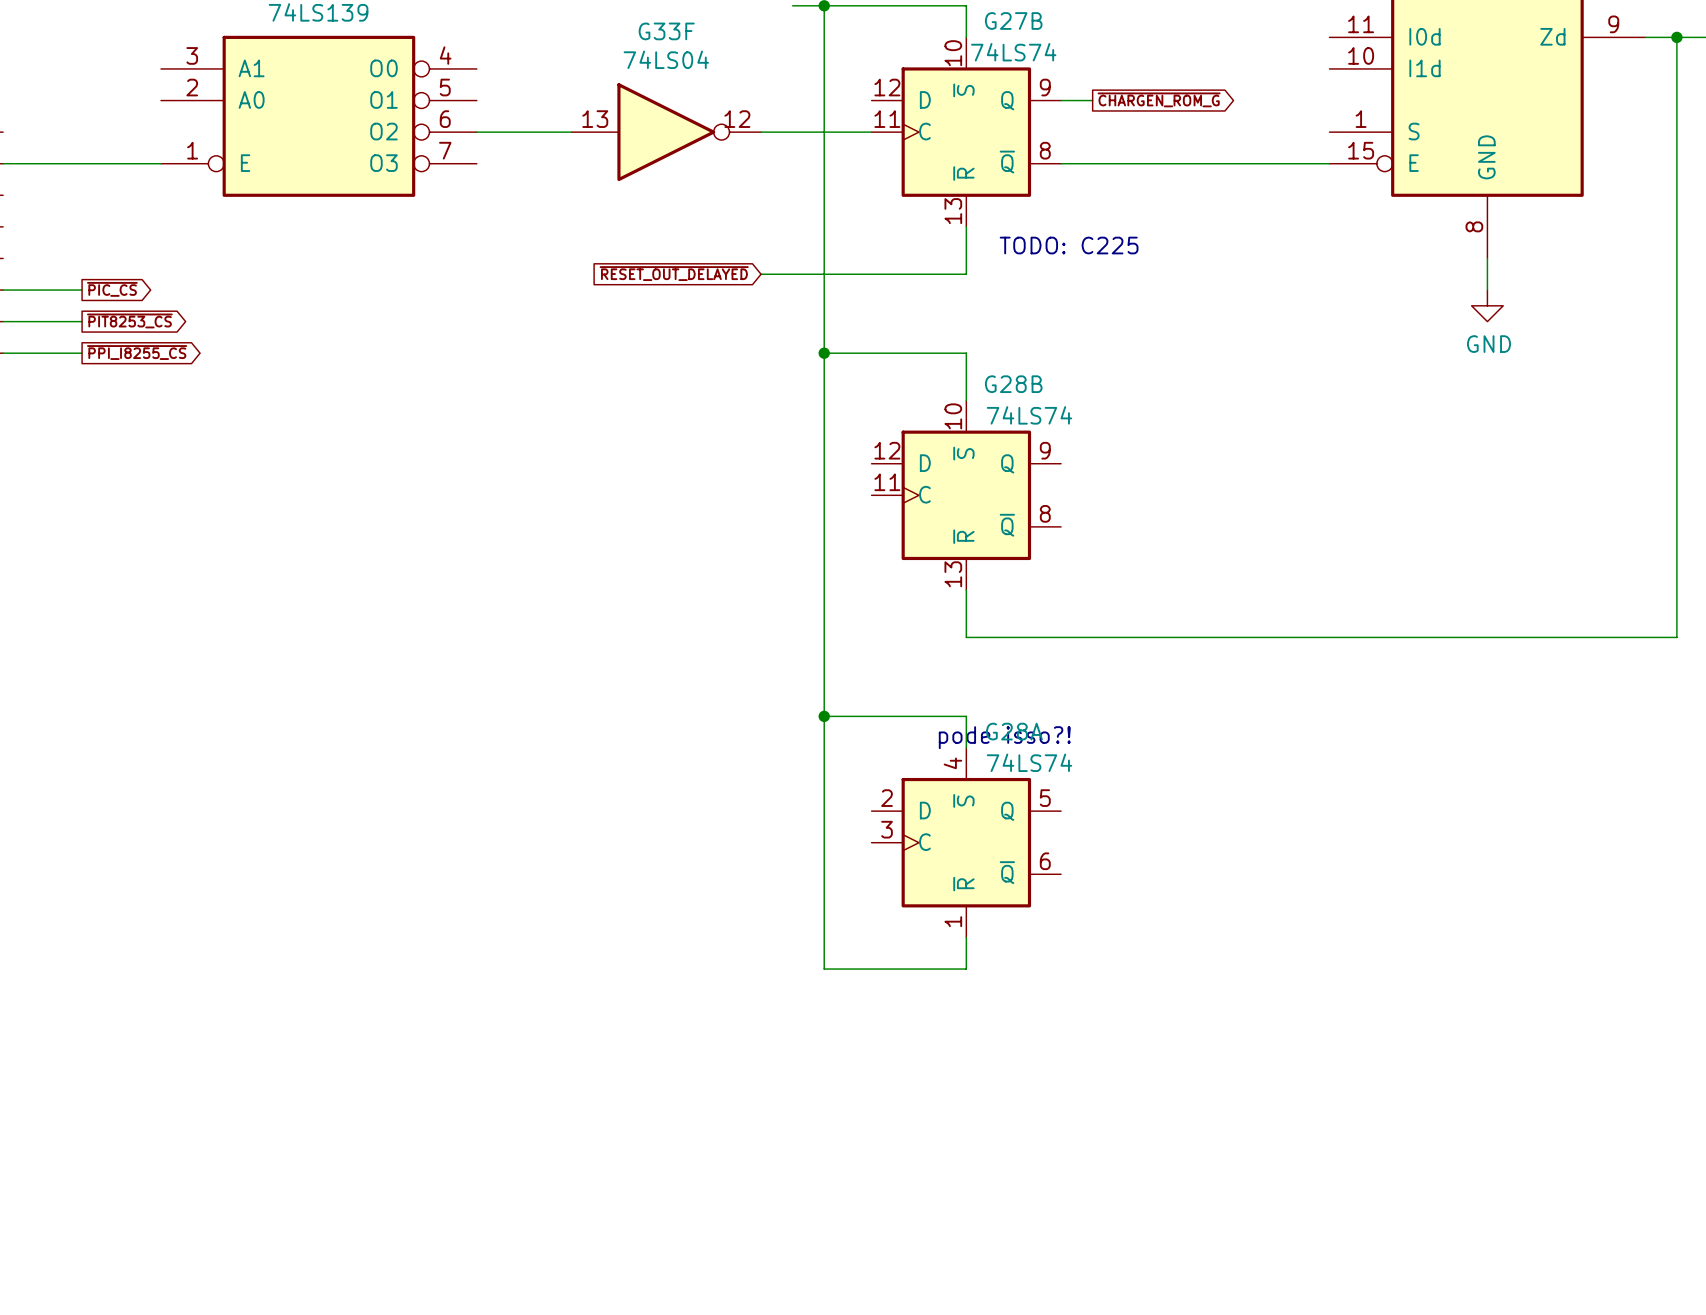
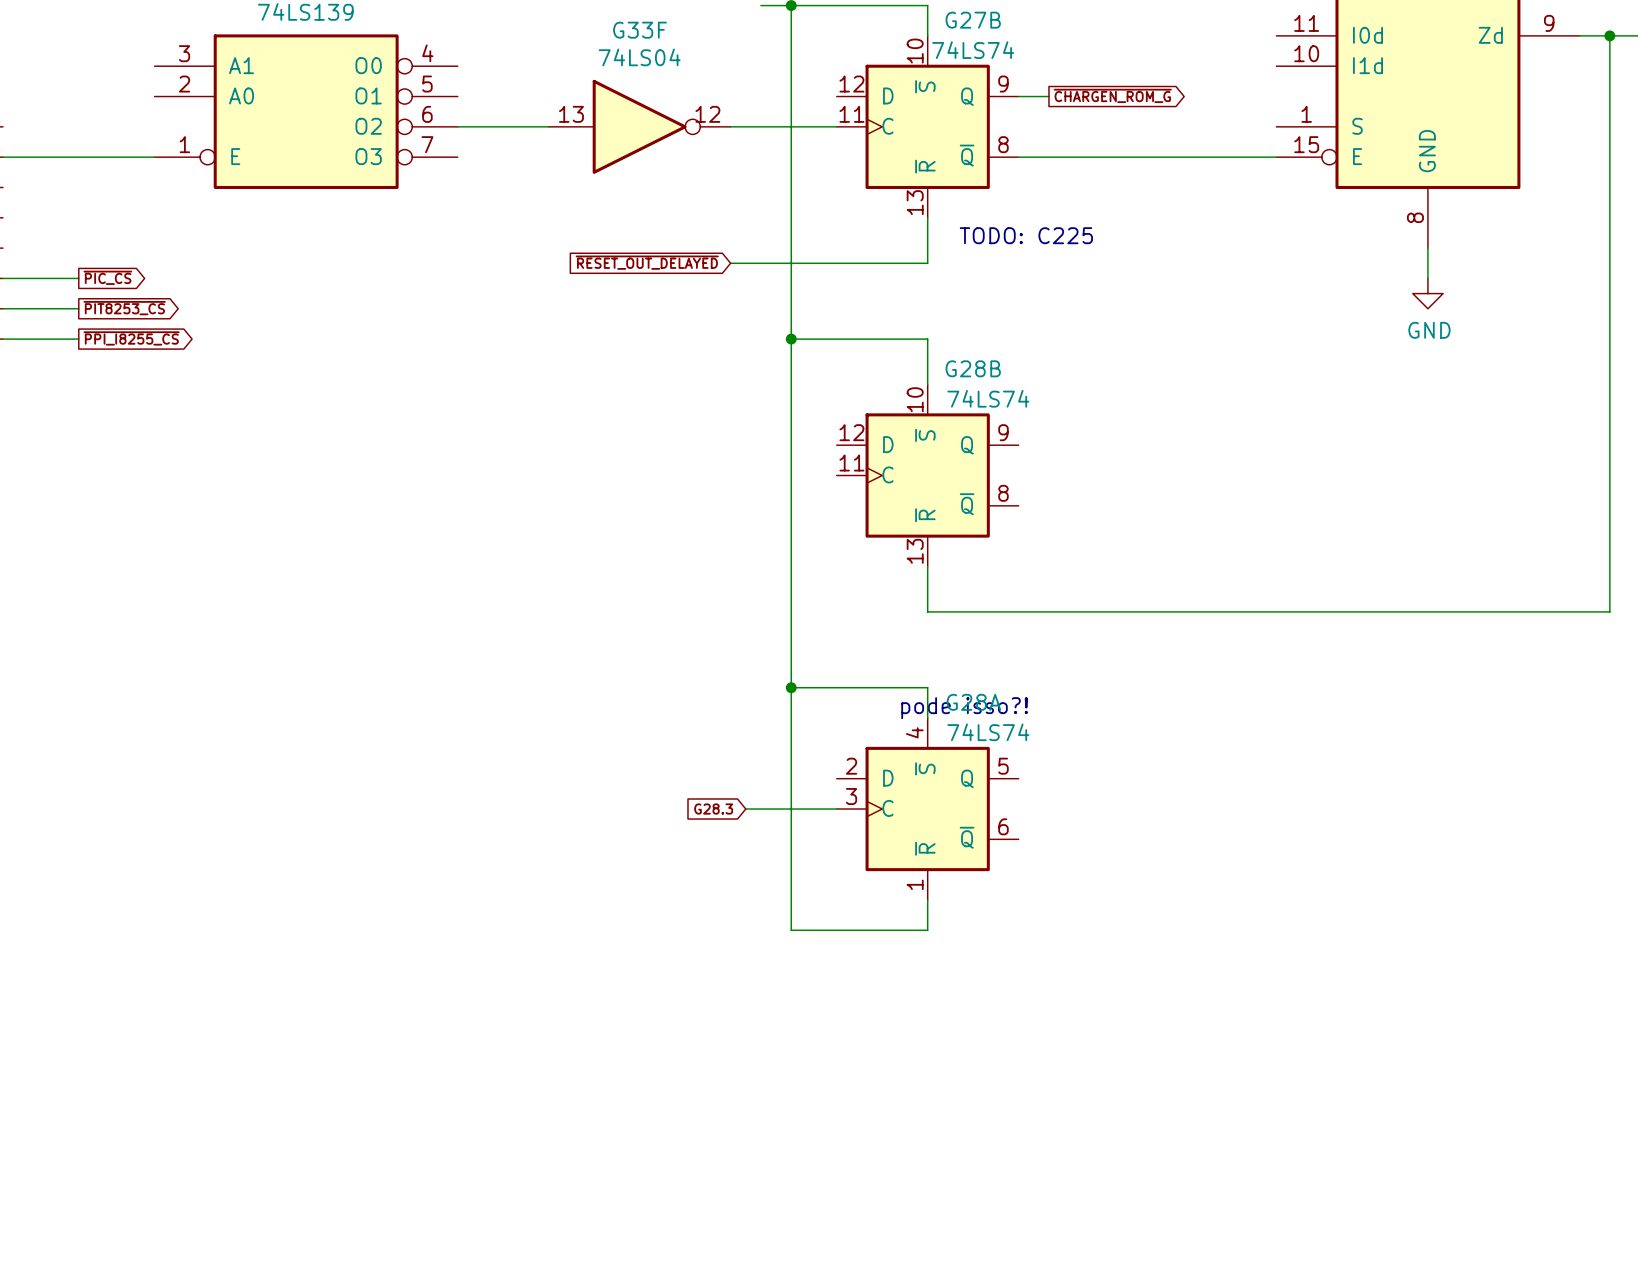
global label: none -> G28.3 (713, 809)
wire: none -> (745, 809) (836, 809)

